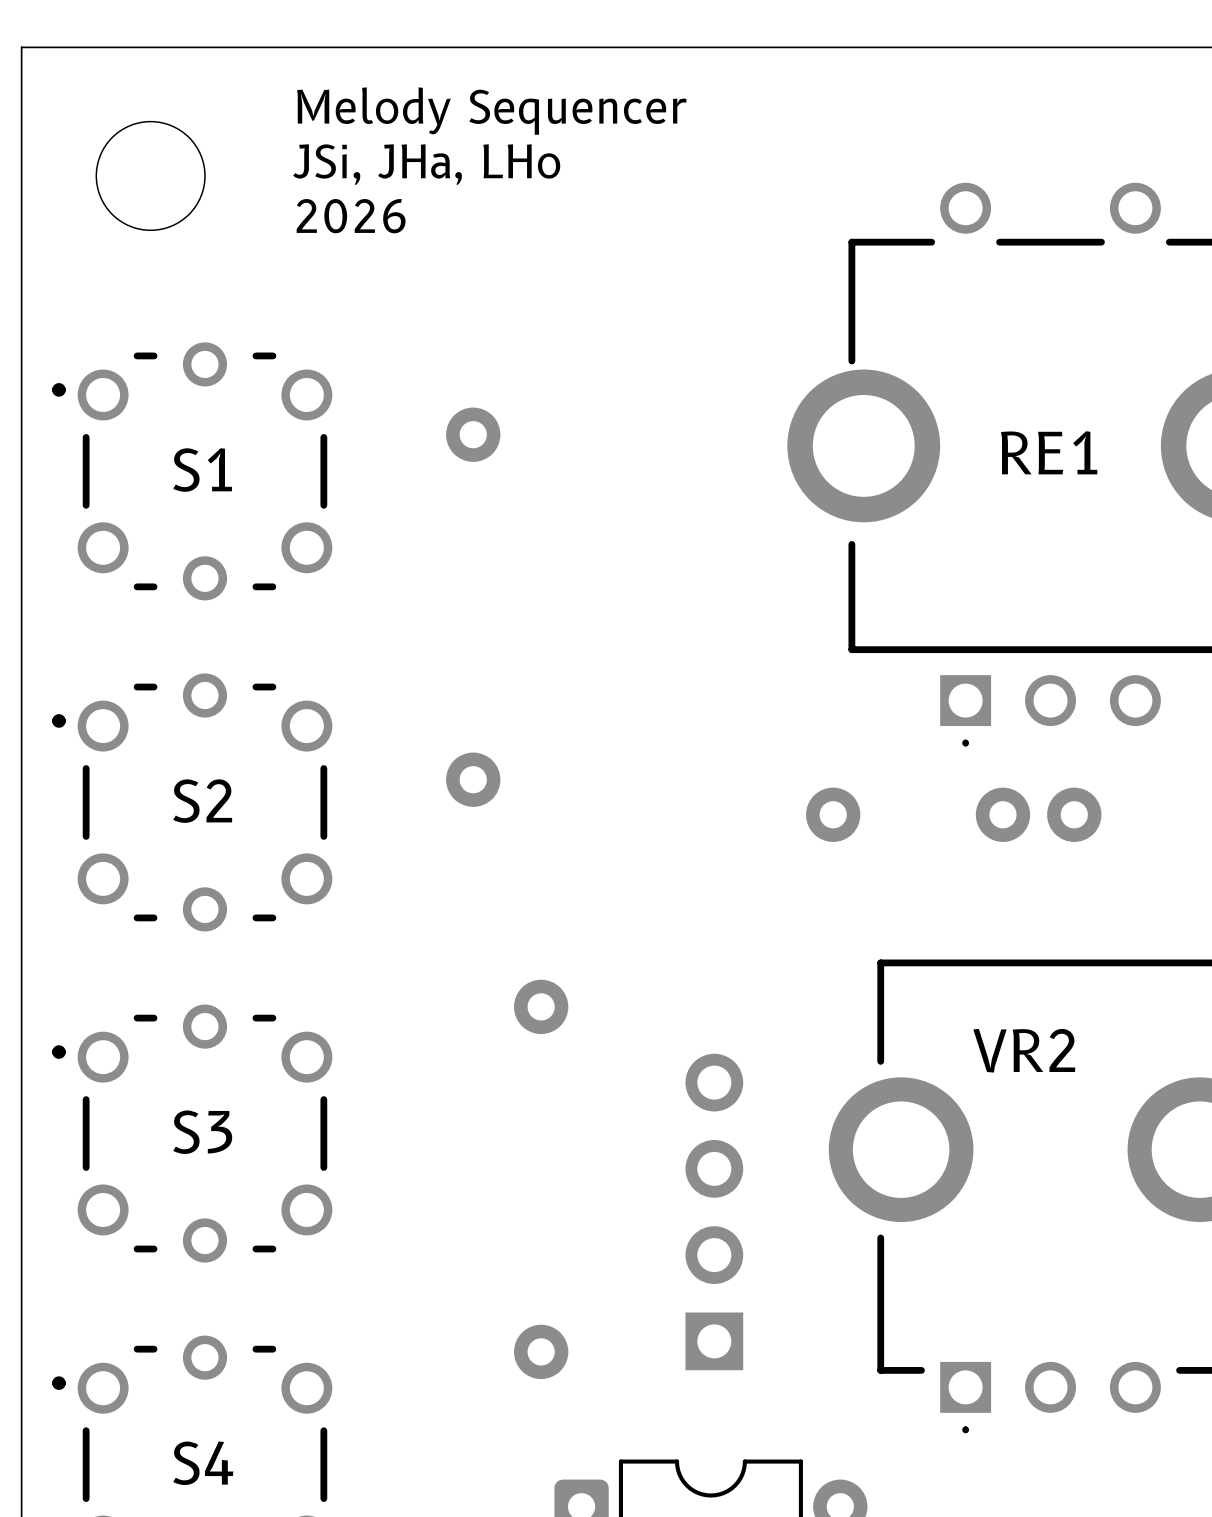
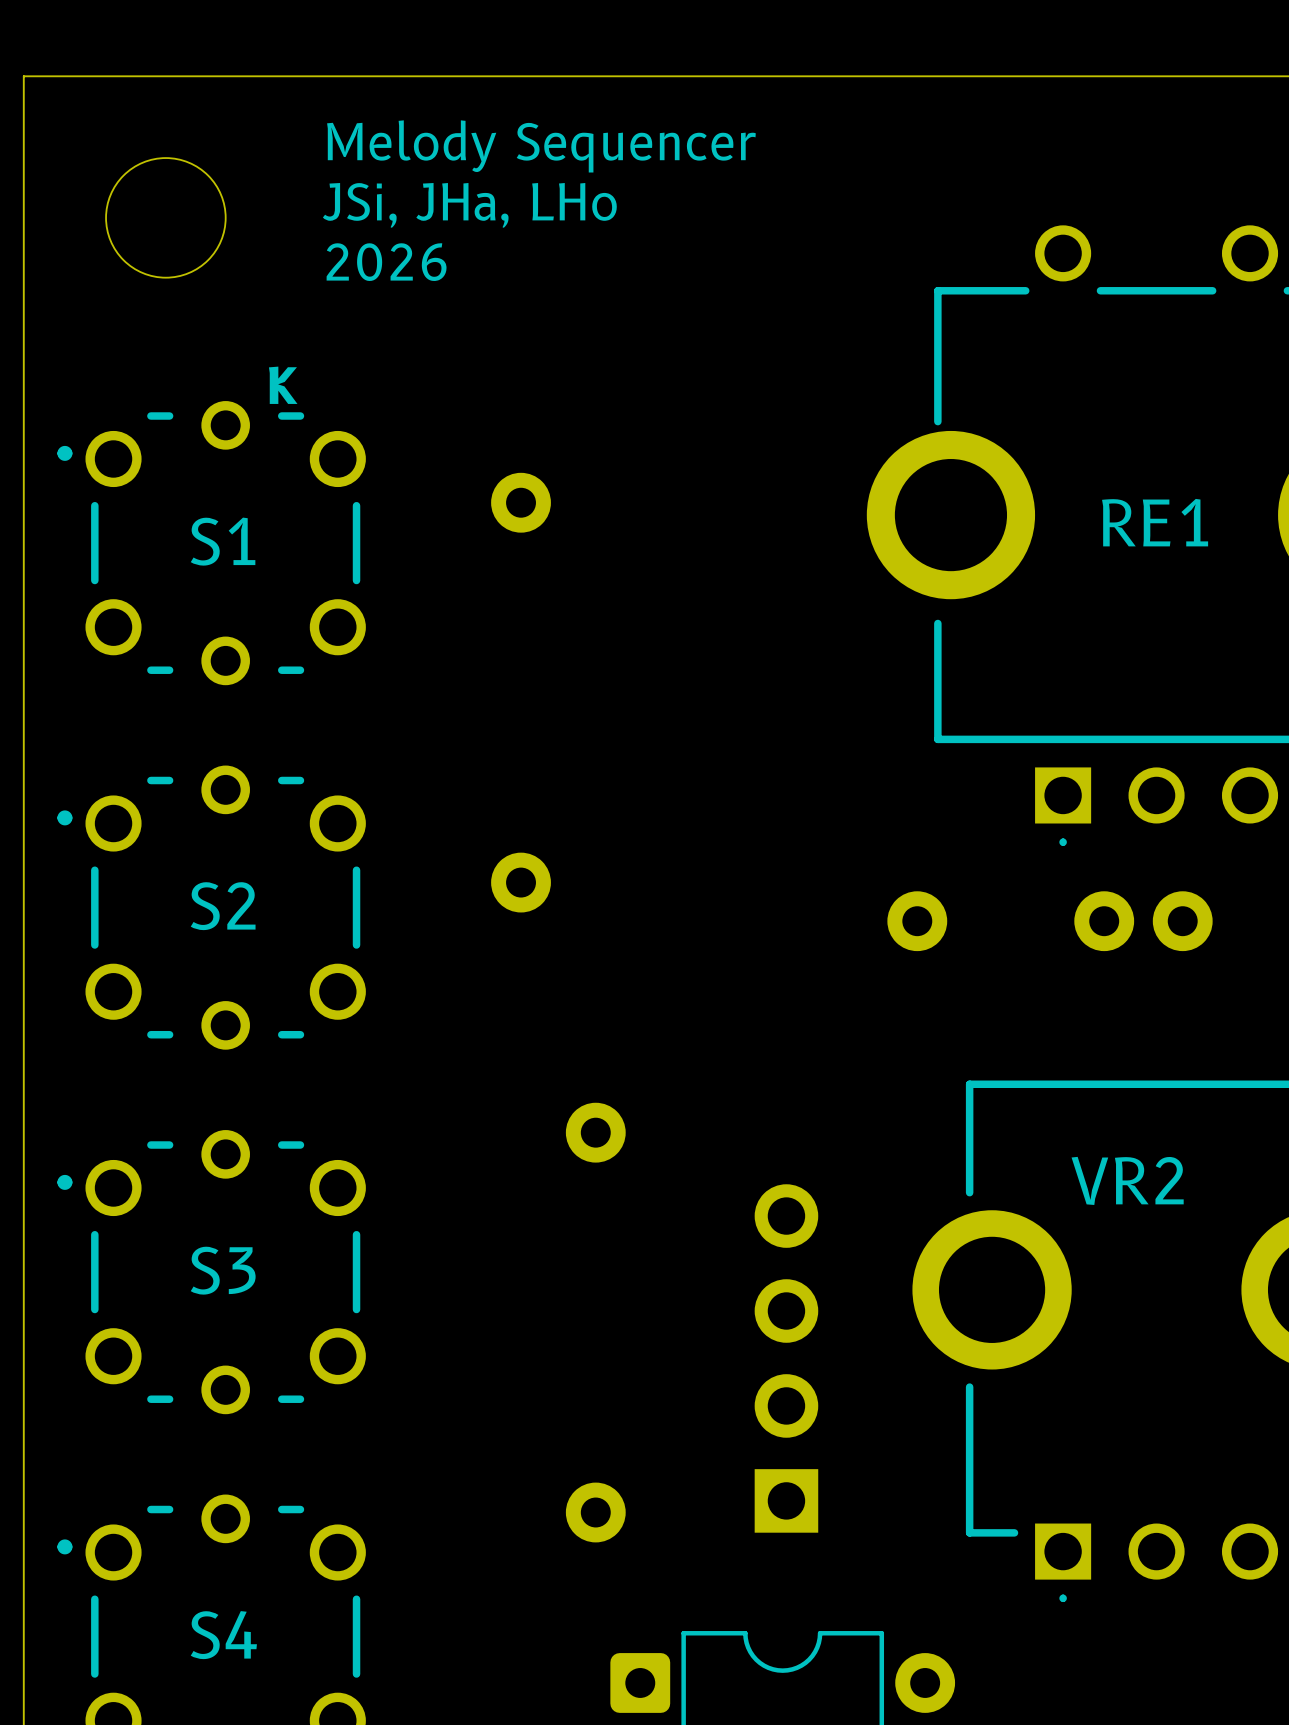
text: none -> K (283, 385)

